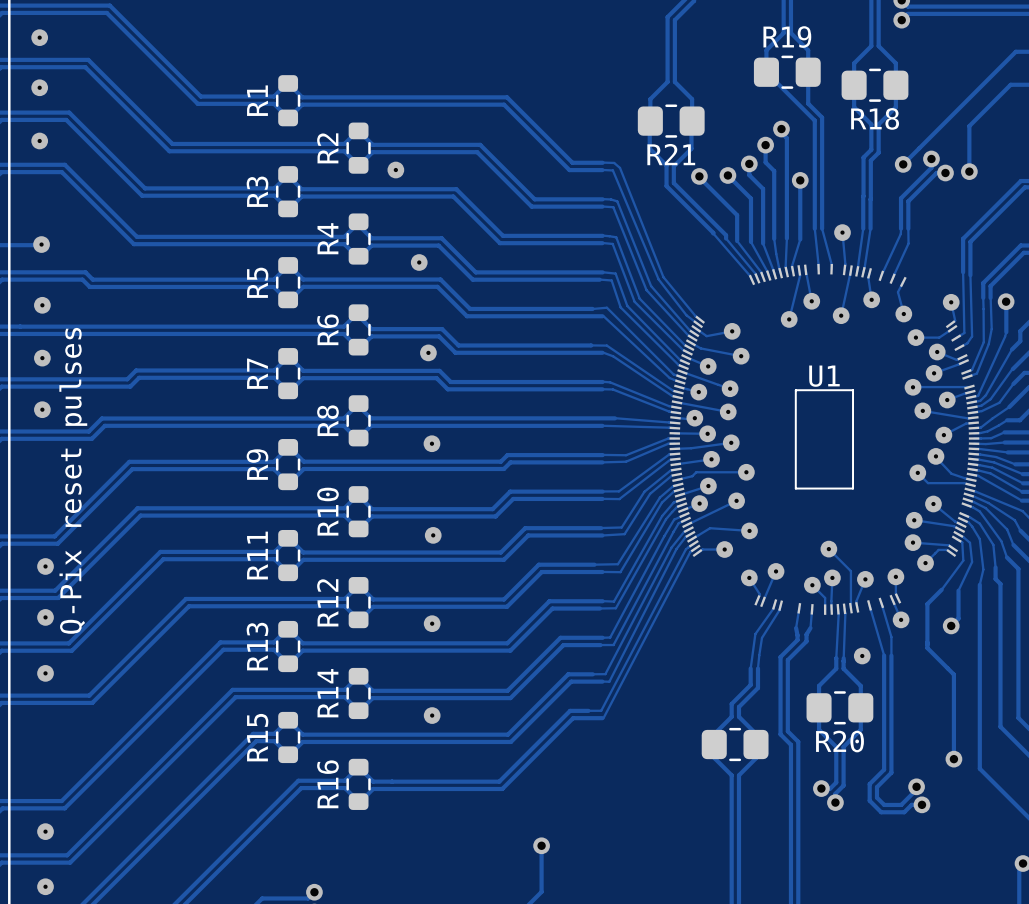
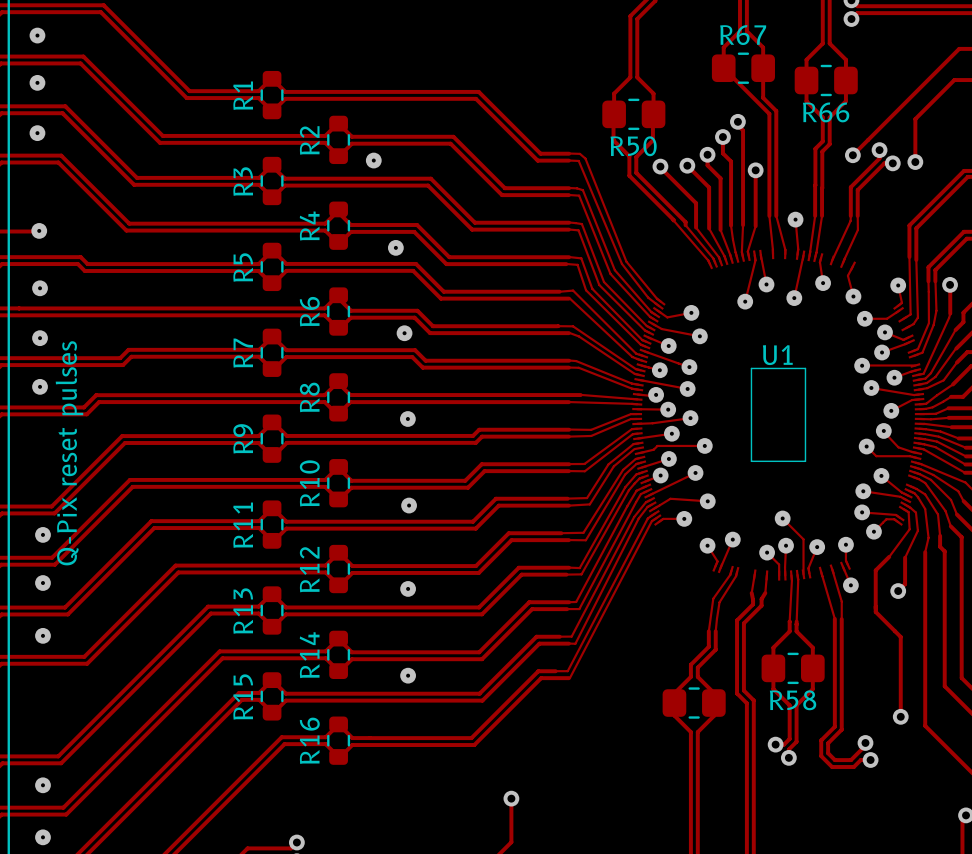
R19 name: R19 (787, 37) -> R67 (743, 35)
R18 name: R18 (875, 118) -> R66 (826, 112)
R21 name: R21 (671, 154) -> R50 (633, 146)
via: (862, 655) -> none
R20 name: R20 (839, 741) -> R58 (793, 700)

